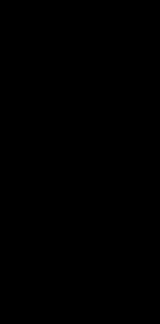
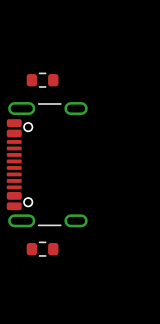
part: none -> (42, 80)
part: none -> (47, 164)
part: none -> (42, 249)

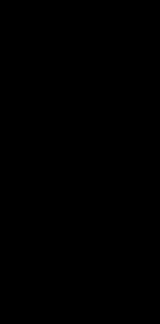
part: (42, 80) -> none
part: (47, 164) -> none
part: (42, 249) -> none

